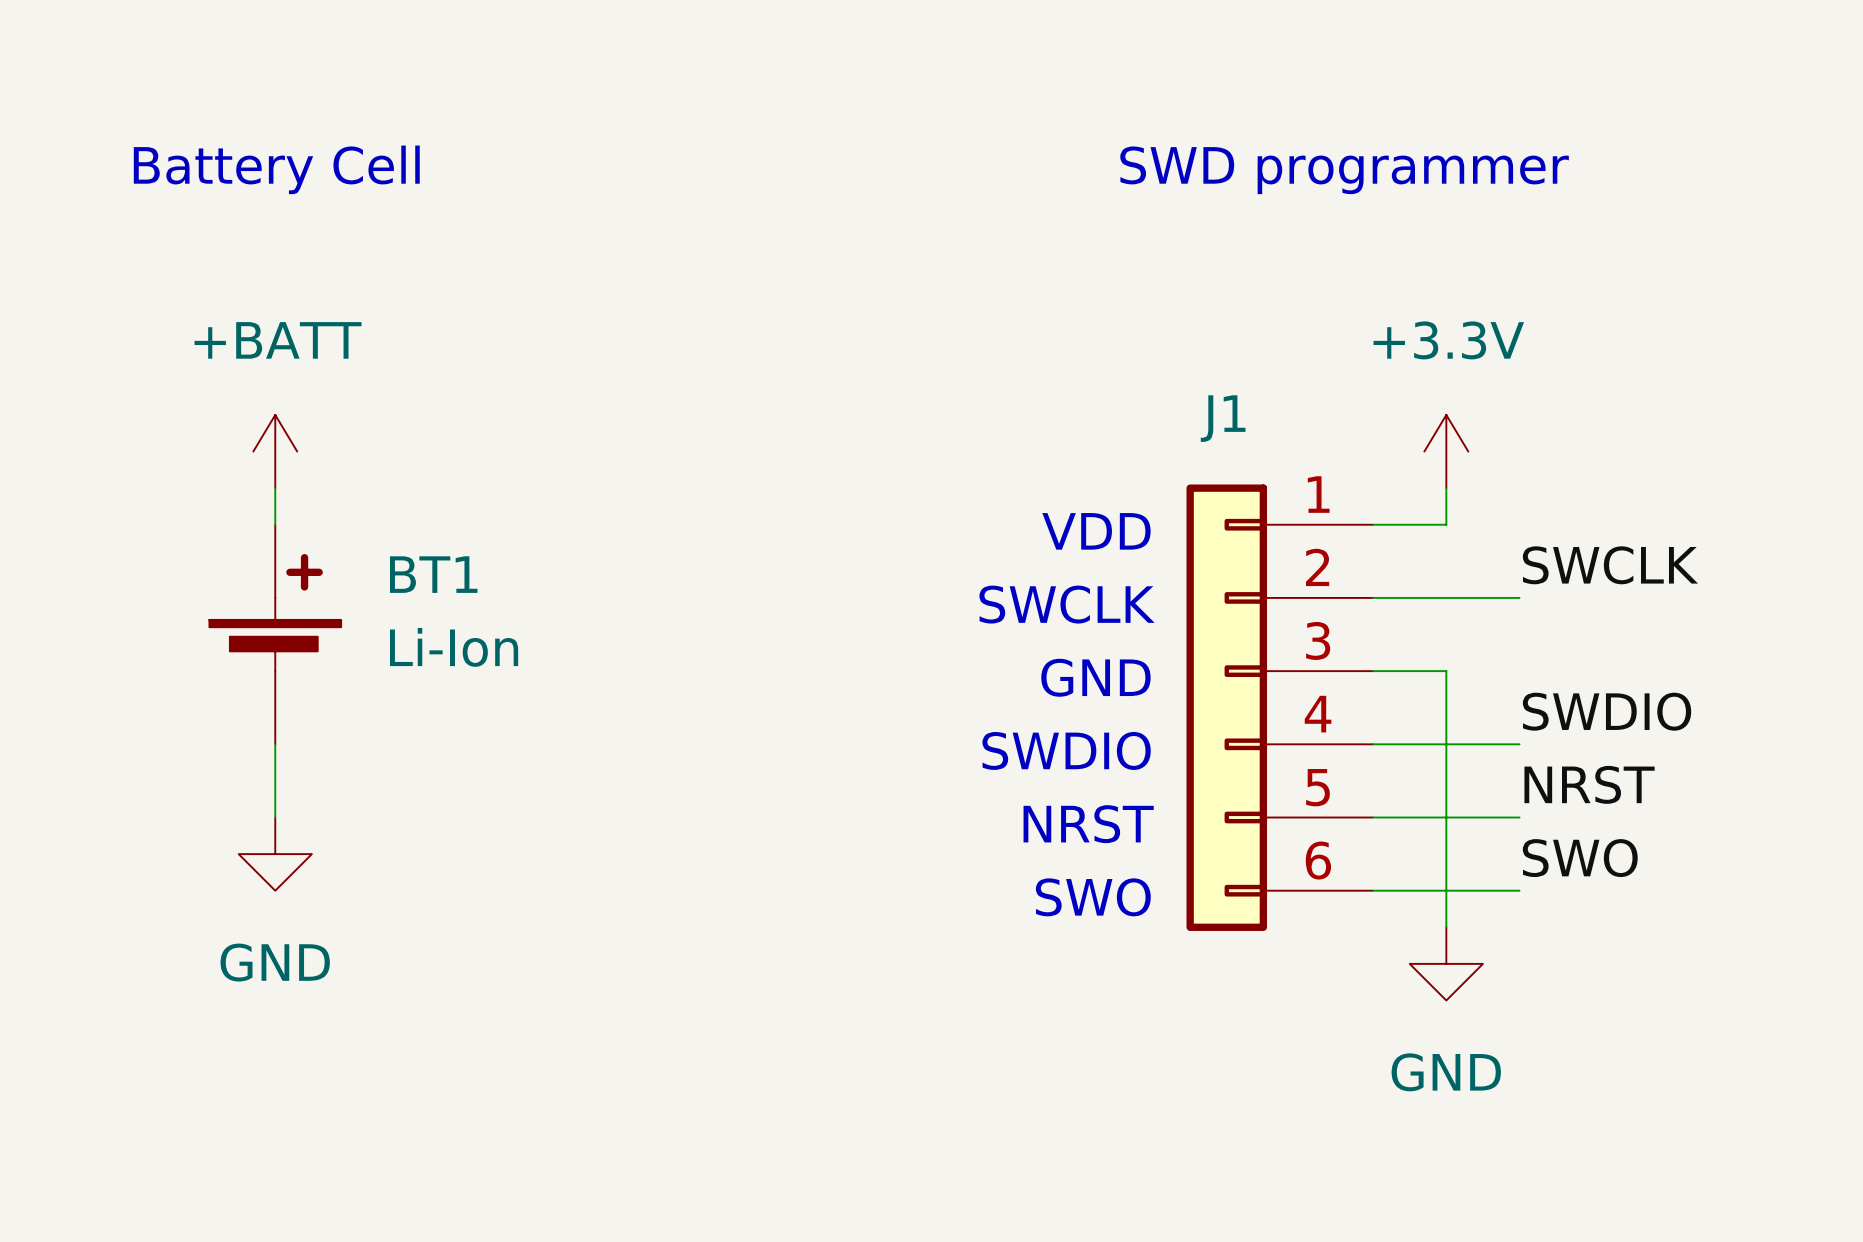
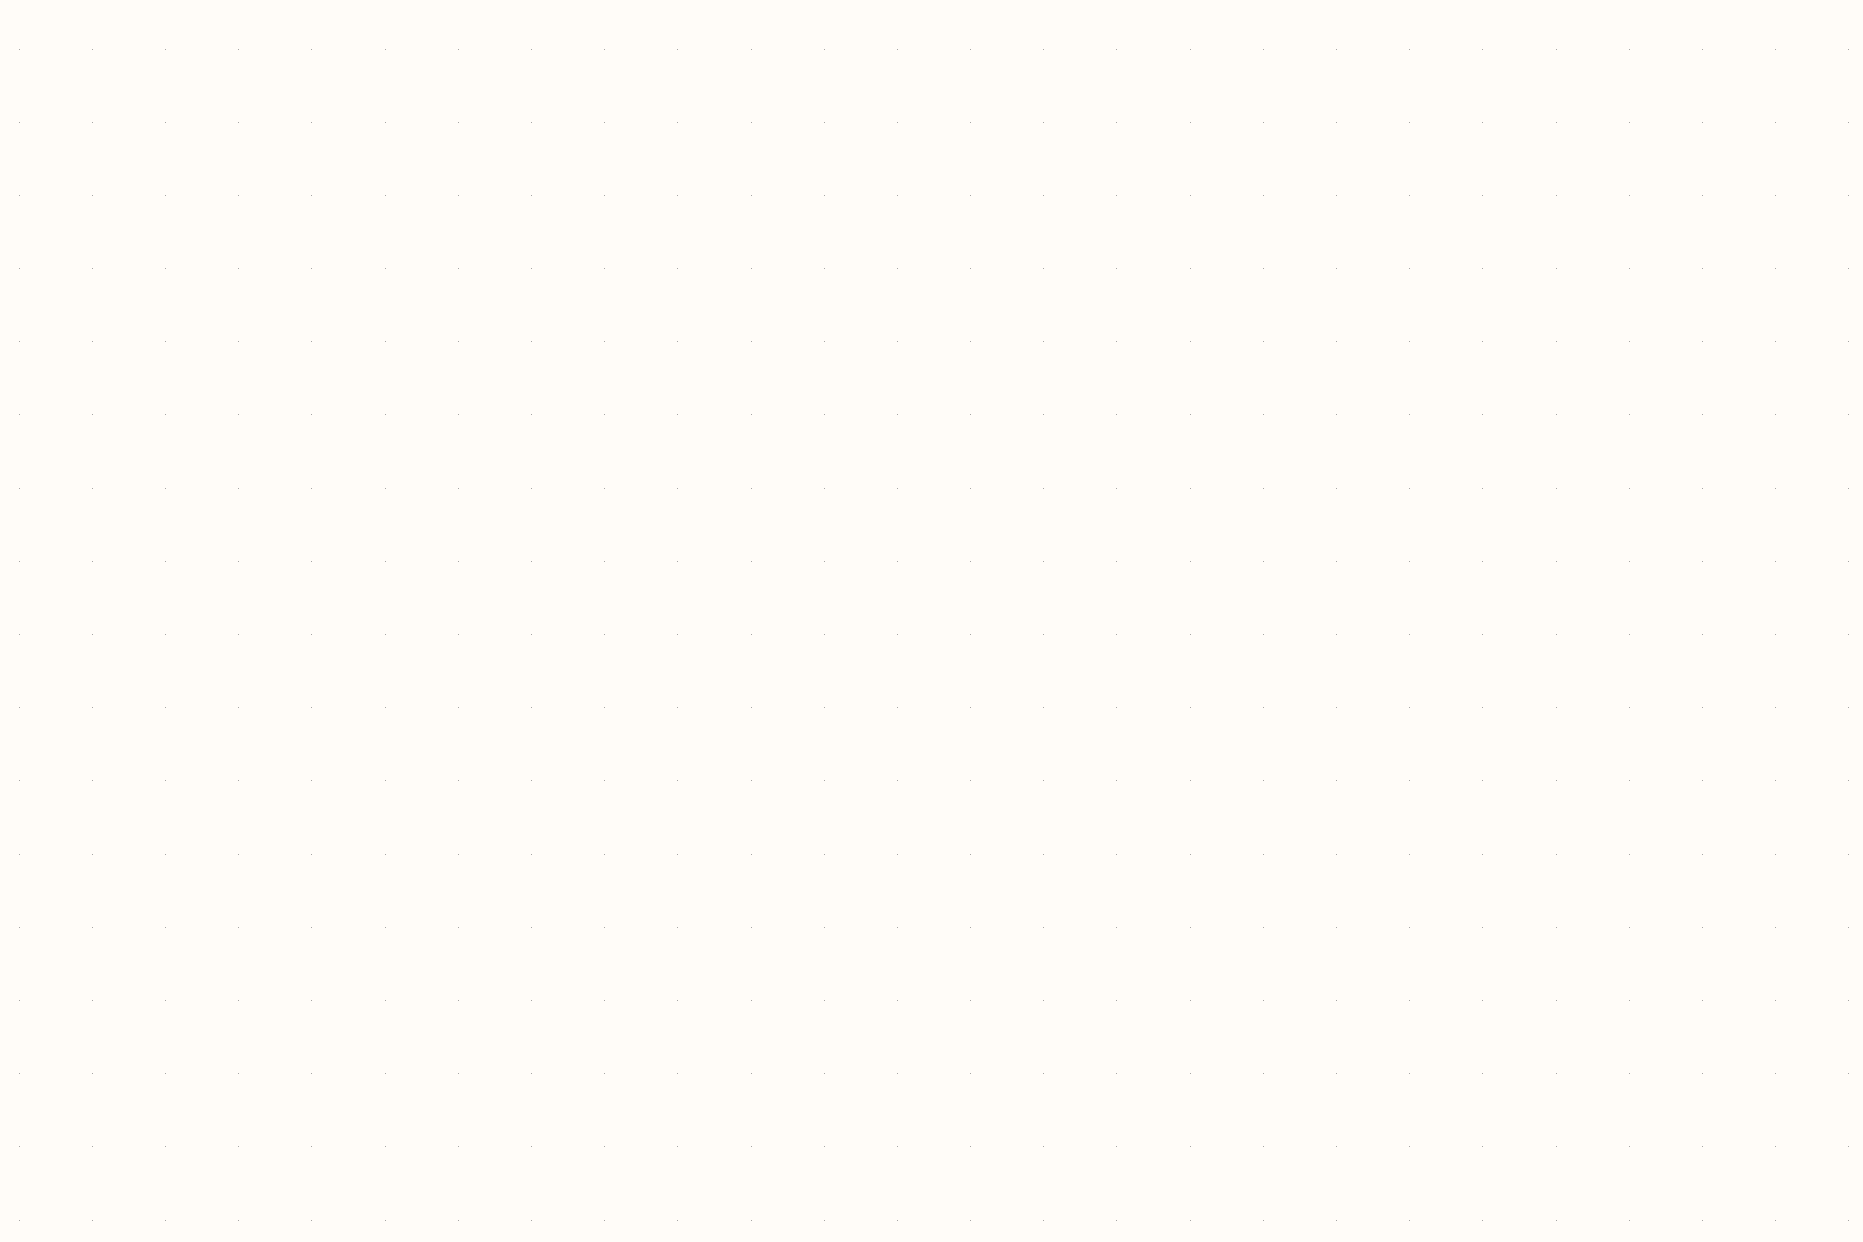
text: Battery Cell (276, 169) -> none
text: SWD programmer (1344, 170) -> none
power symbol: +BATT (275, 451) -> none
power symbol: +3.3V (1446, 451) -> none
wire: (275, 488) (275, 524) -> none
wire: (1446, 488) (1446, 524) (1373, 524) -> none
text: VDD (1096, 531) -> none
label: SWCLK (1610, 565) -> none
wire: (1373, 597) (1519, 597) -> none
text: SWCLK (1067, 604) -> none
BT1: Li-Ion (275, 634) -> none
wire: (1373, 671) (1446, 671) (1446, 927) -> none
text: GND (1095, 677) -> none
J1: (1279, 707) -> none
label: SWDIO (1607, 711) -> none
wire: (275, 744) (275, 817) -> none
wire: (1373, 744) (1519, 744) -> none
text: SWDIO (1066, 750) -> none
label: NRST (1589, 784) -> none
wire: (1373, 817) (1519, 817) -> none
text: NRST (1088, 824) -> none
power symbol: GND (275, 854) -> none
label: SWO (1580, 858) -> none
wire: (1373, 890) (1519, 890) -> none
text: SWO (1093, 897) -> none
power symbol: GND (1446, 963) -> none

